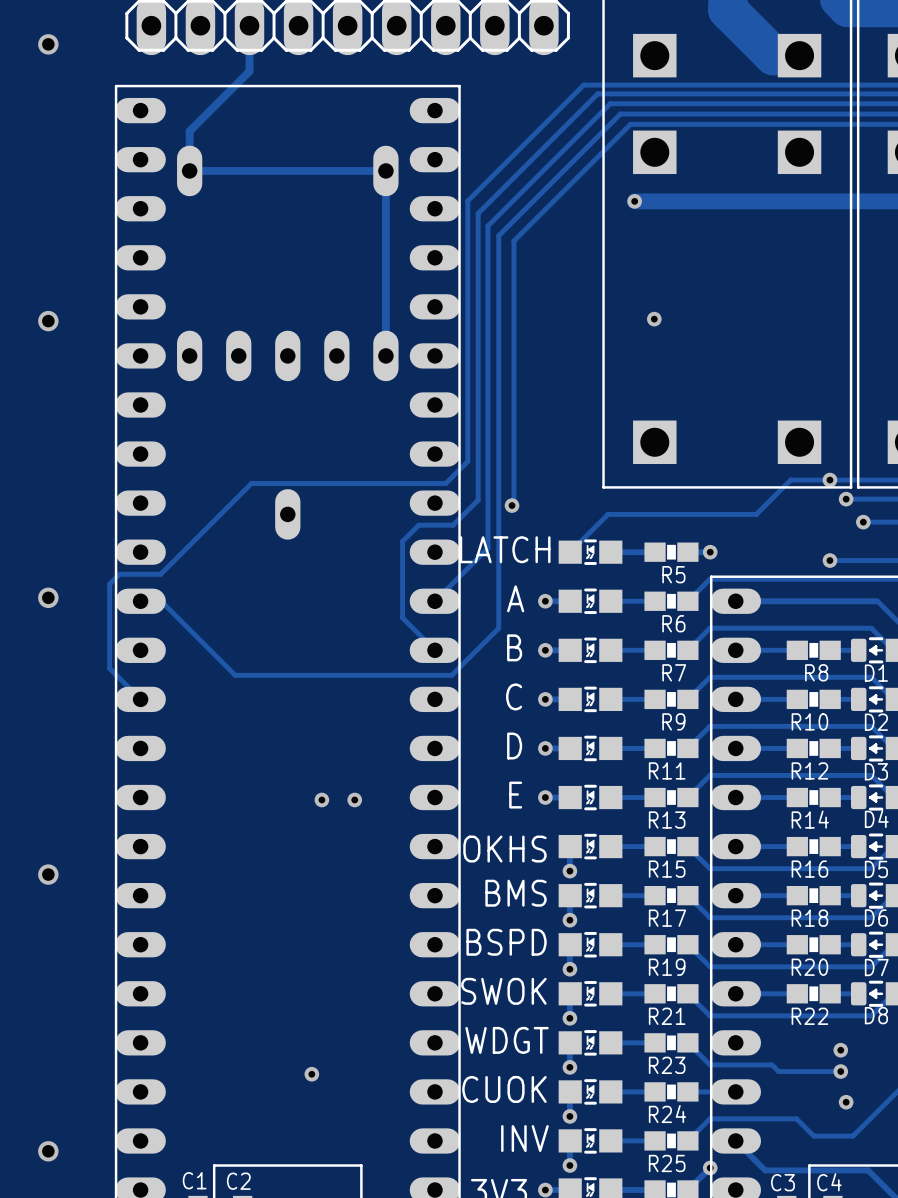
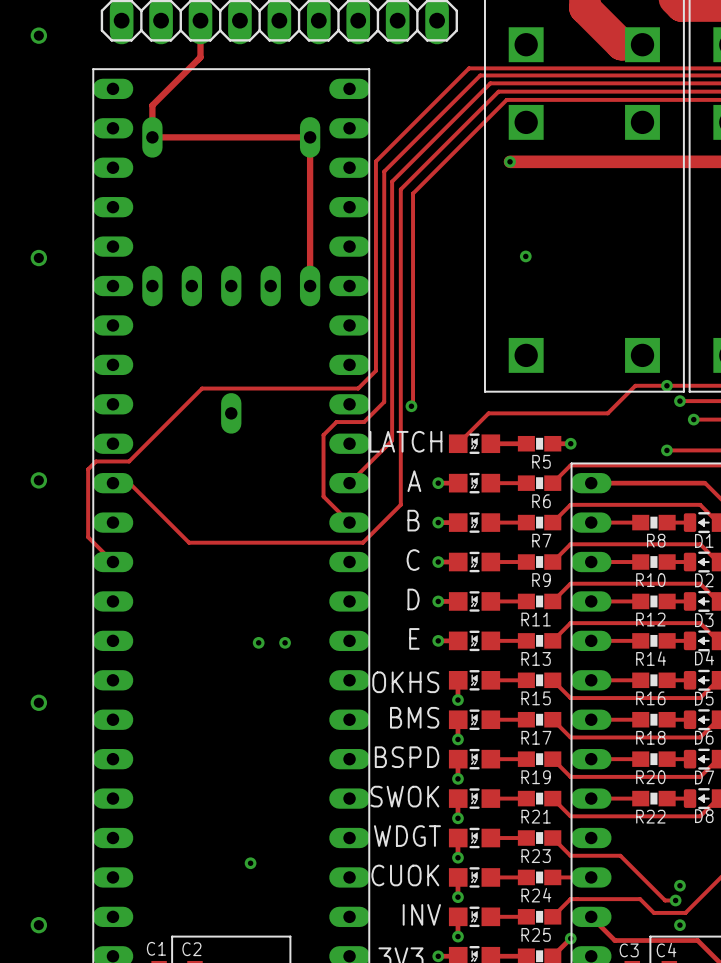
via: (840, 1050) -> none
track: (778, 1071) (840, 1071) -> (625, 861) (665, 900) (675, 900)
via: (840, 1071) -> none
via: none -> (675, 900)
via: none -> (679, 925)

